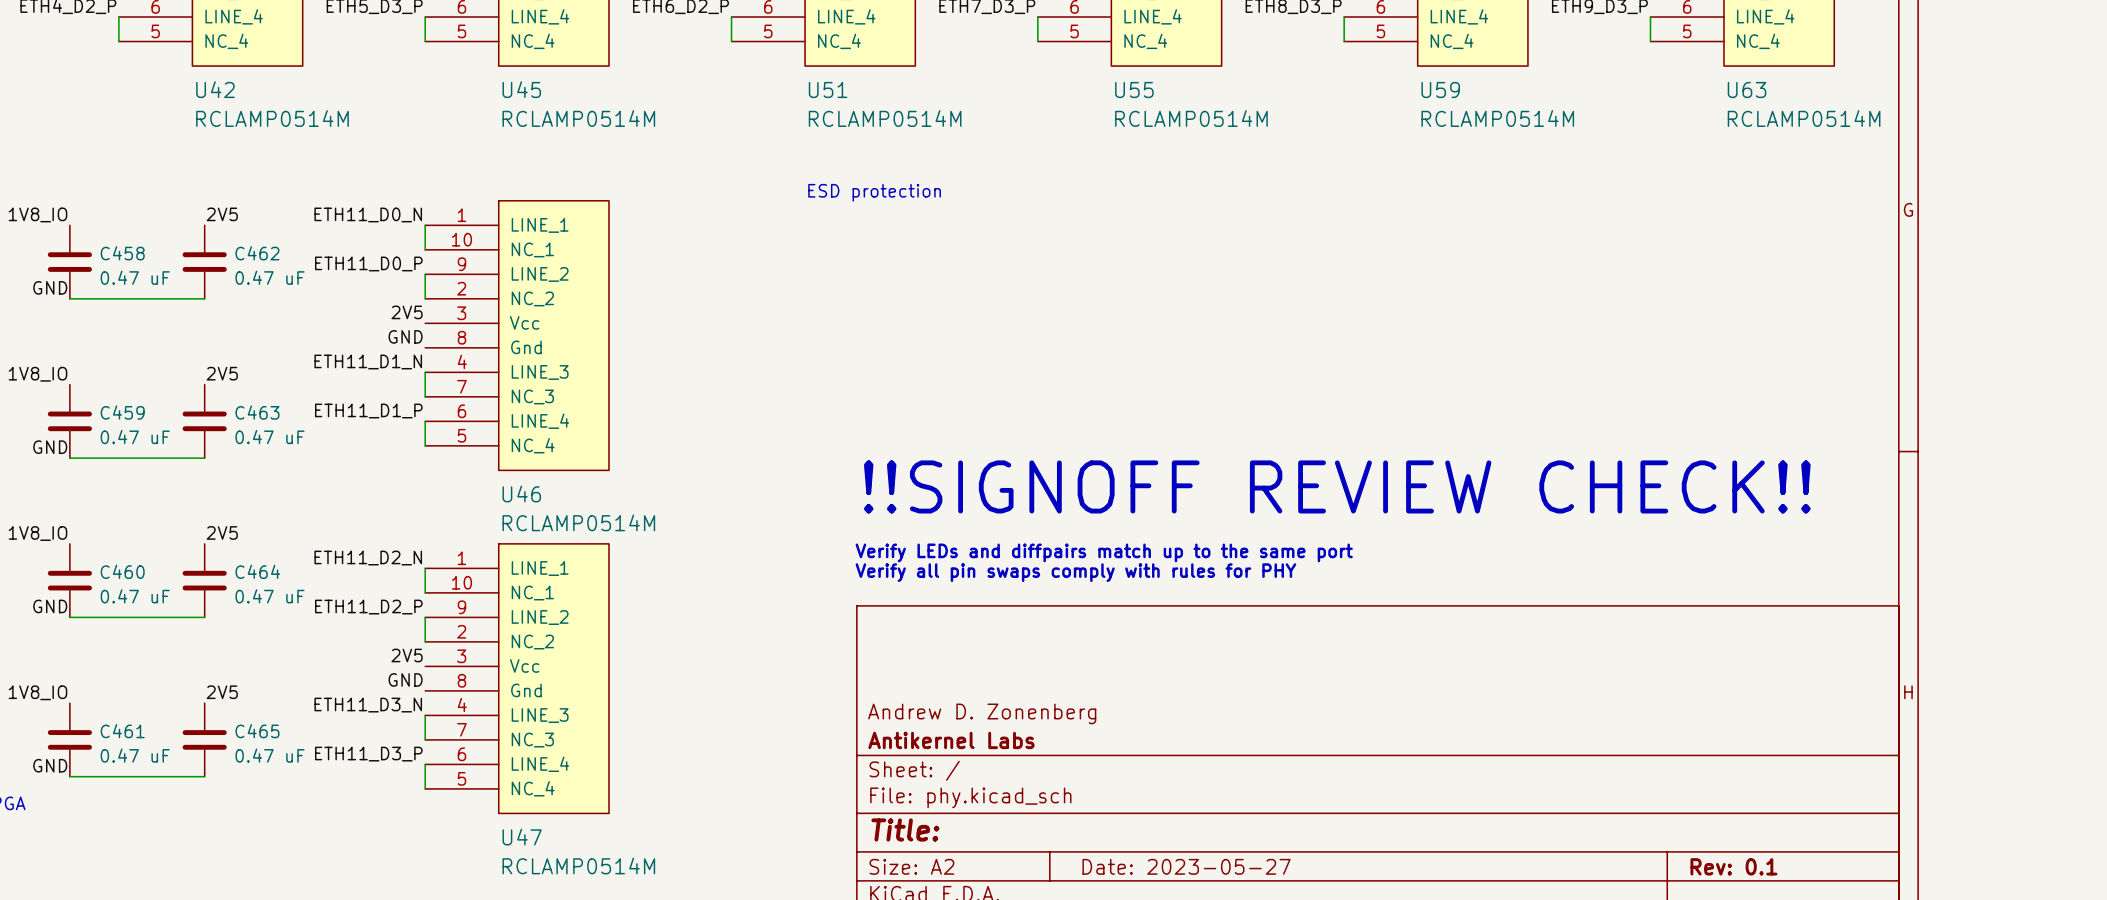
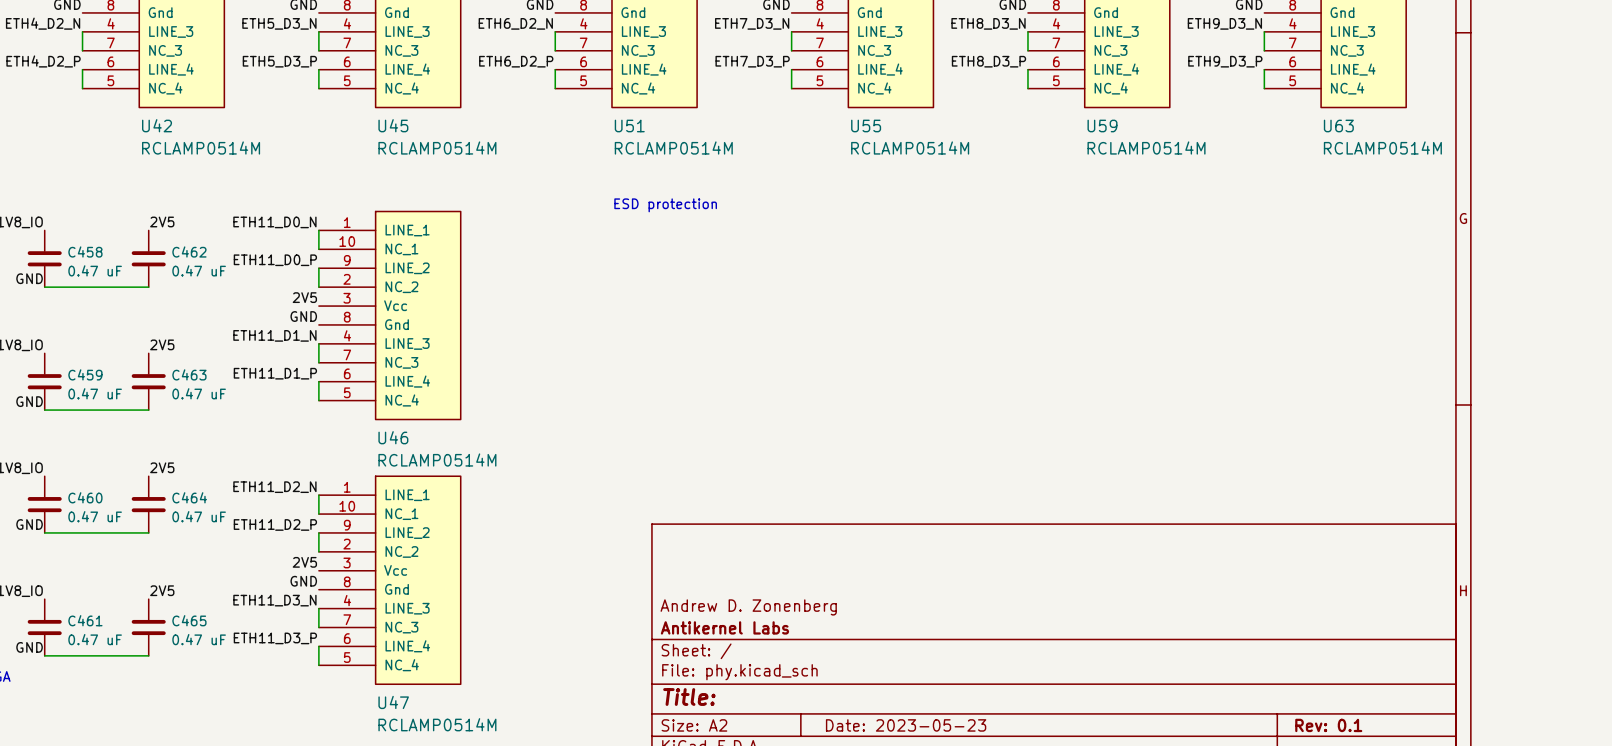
text: !!SIGNOFF REVIEW CHECK!! (1337, 486) -> none
text: Verify LEDs and diffpairs match up to the same port (1104, 552) -> none
text: Verify all pin swaps comply with rules for PHY (1075, 572) -> none
title block: Date: 2023-05-27 (1186, 866) -> Date: 2023-05-23 (906, 725)

